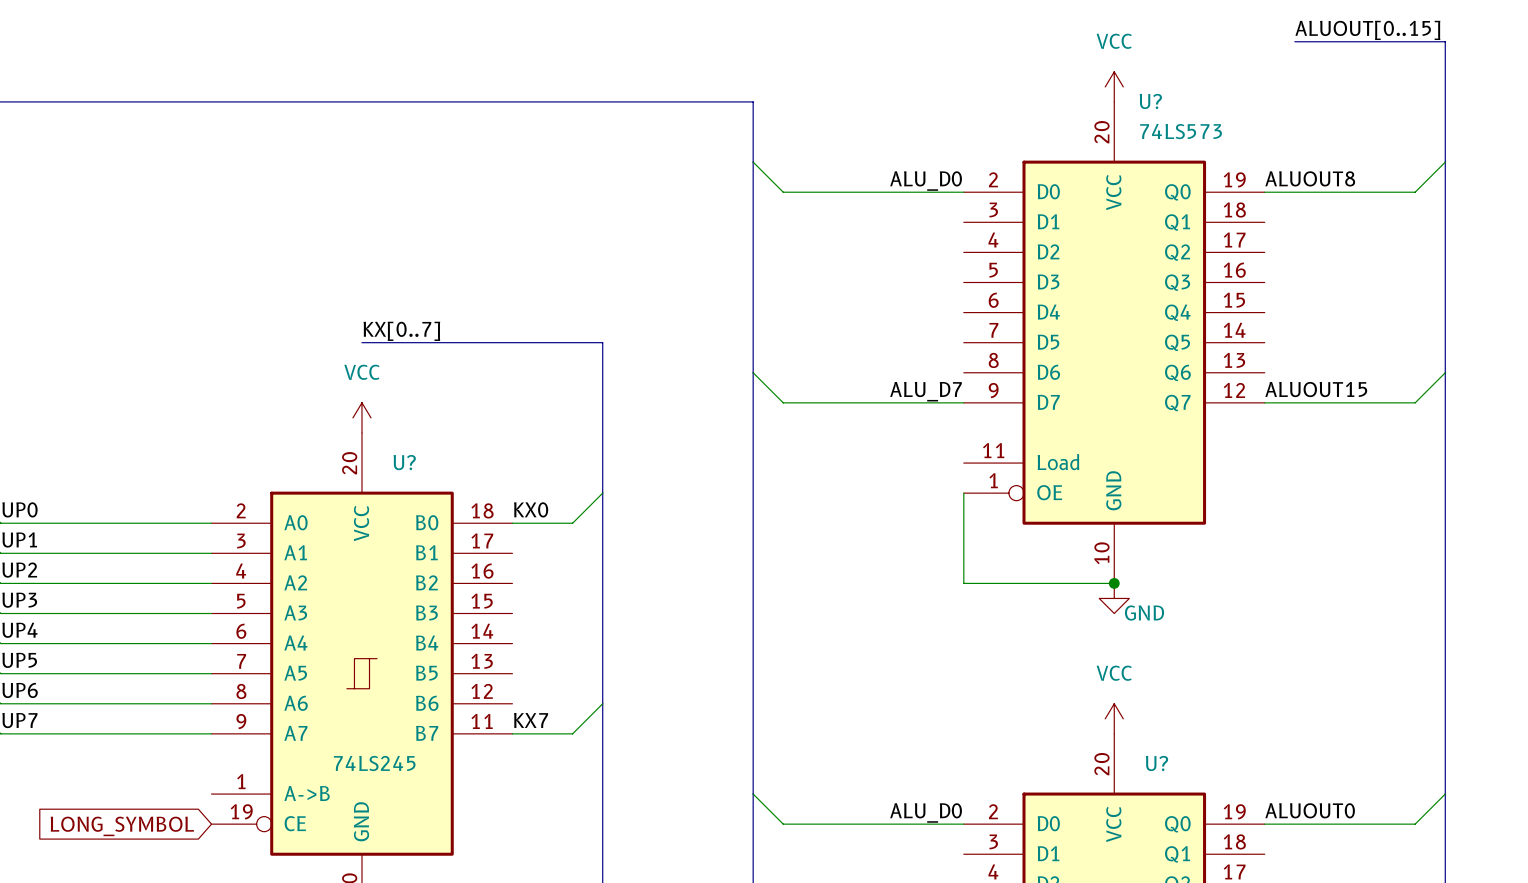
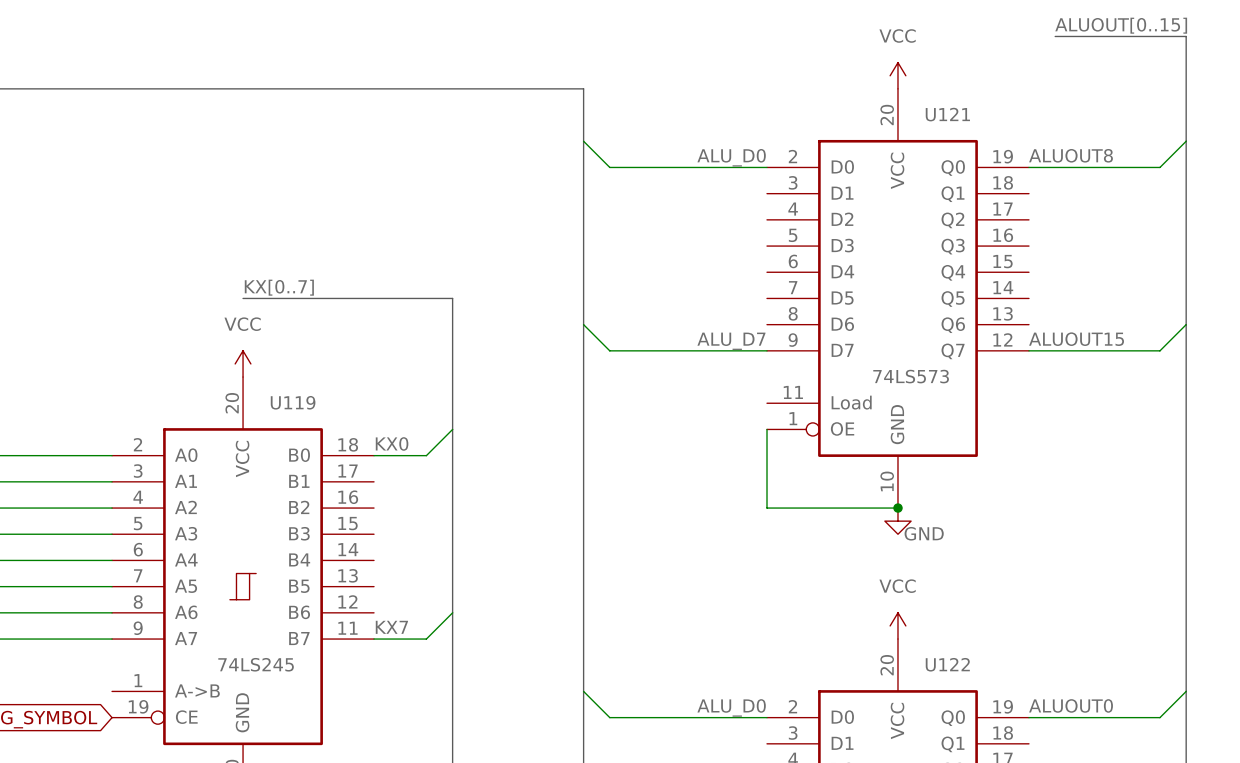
U? name: U? (1150, 101) -> U121 (947, 114)
U? value position: 74LS573 (1181, 131) -> 74LS573 (911, 376)
U? name: U? (404, 462) -> U119 (293, 402)
U? name: U? (1156, 763) -> U122 (947, 664)

